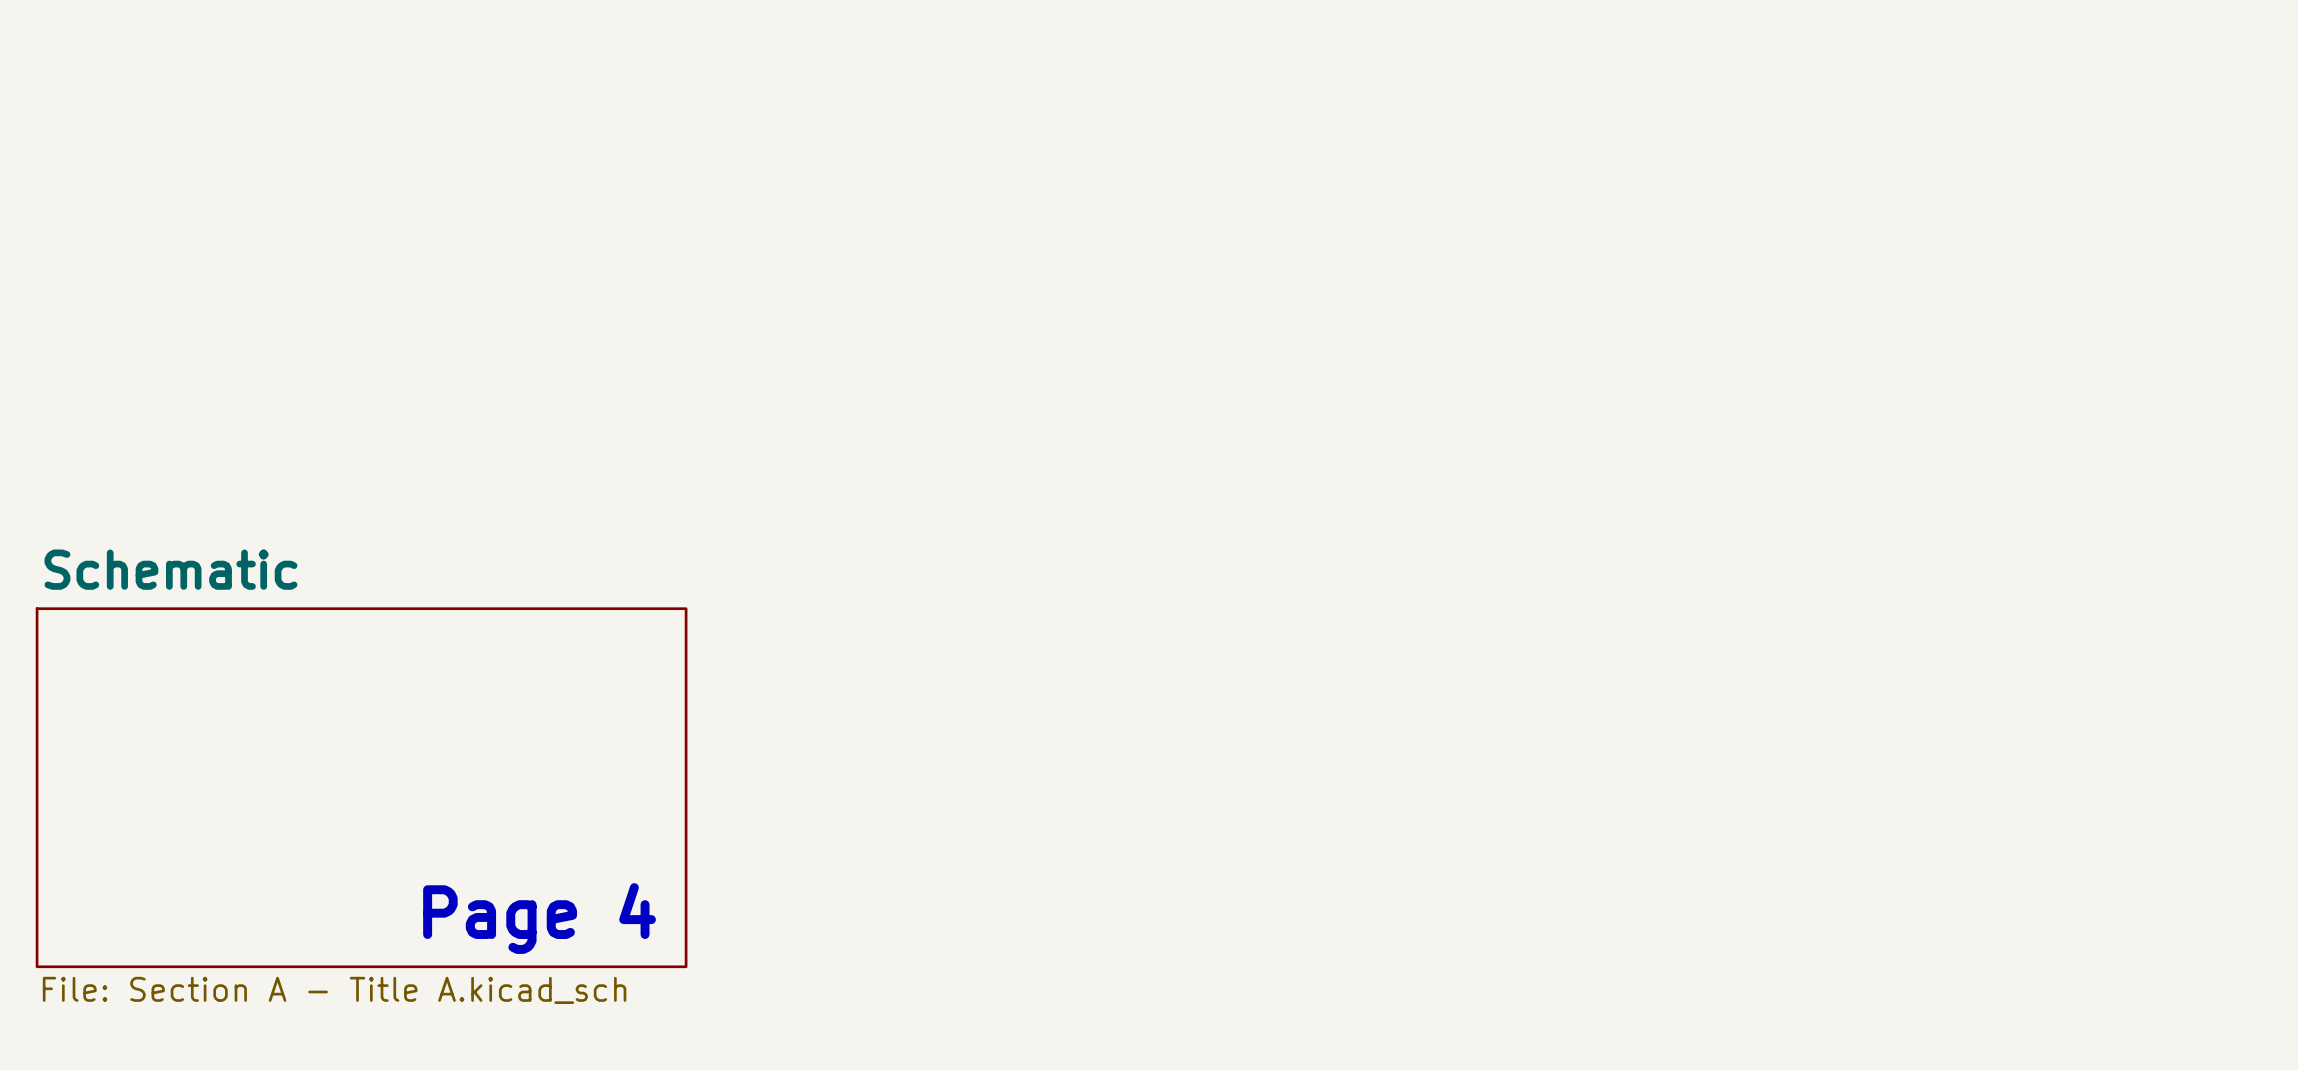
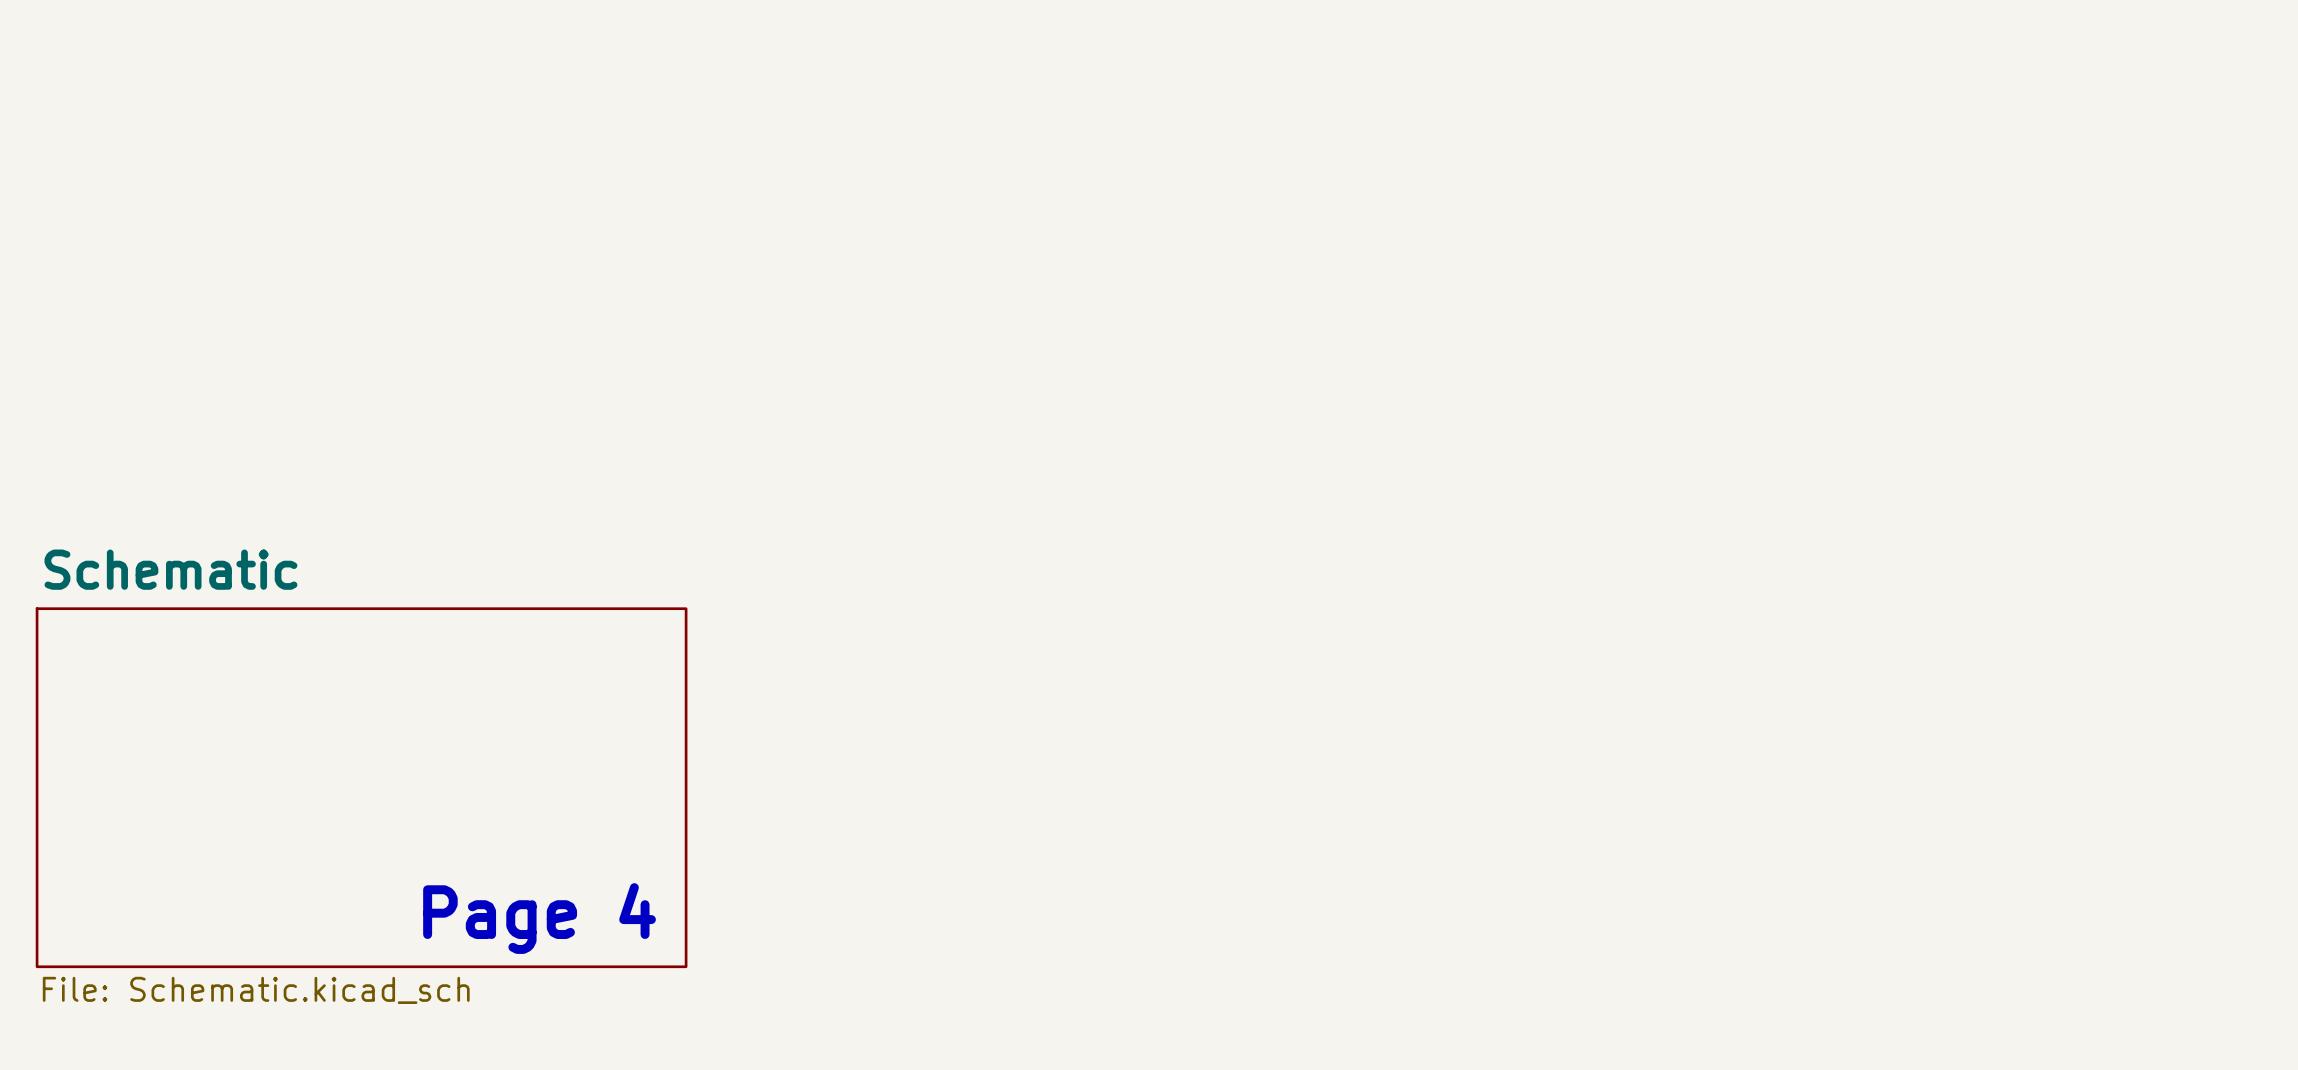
sheet Schematic value: File: Section A - Title A.kicad_sch (334, 990) -> File: Schematic.kicad_sch (256, 990)

